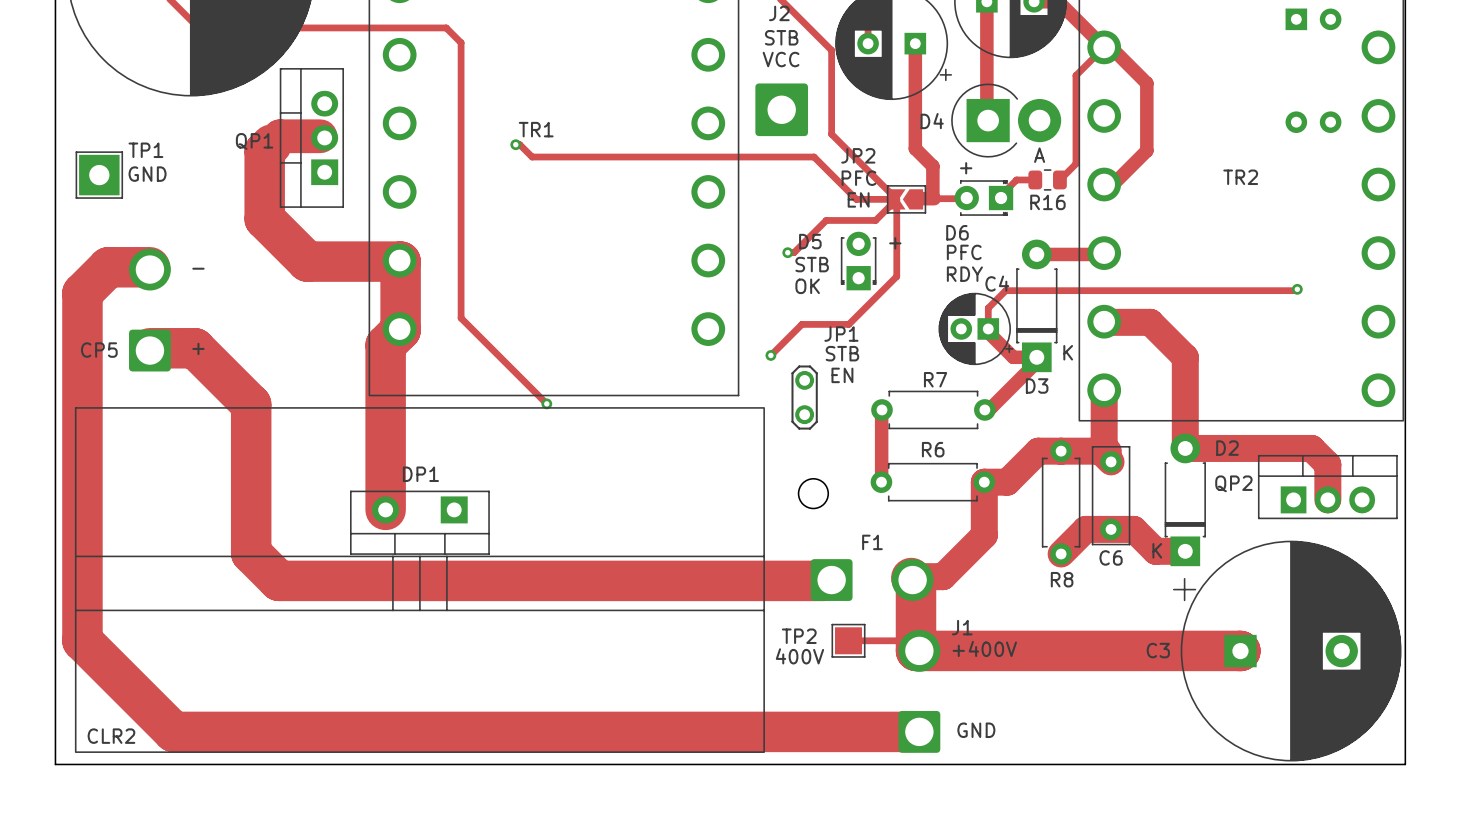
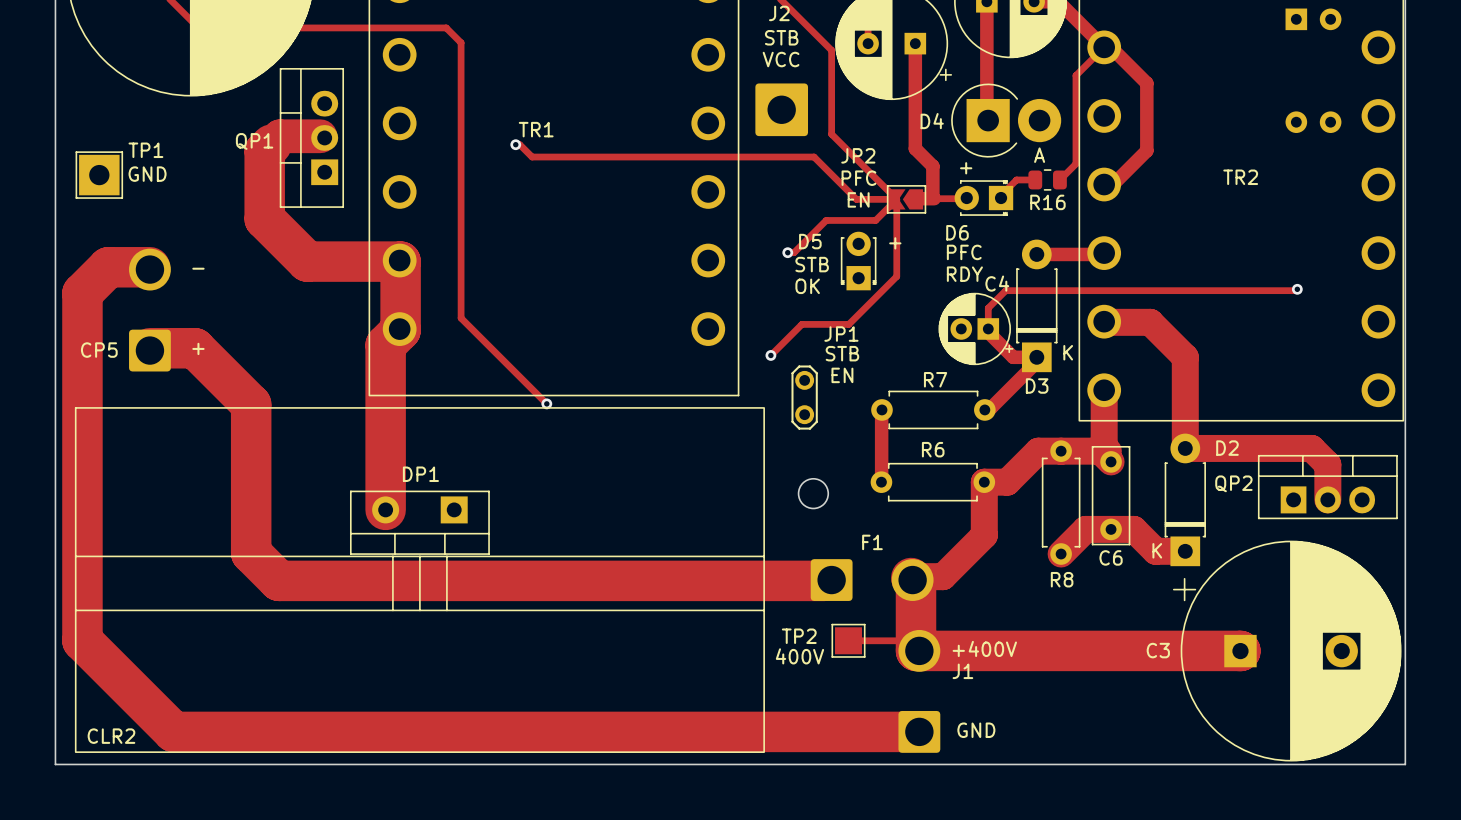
J1 name position: J1 (962, 627) -> J1 (962, 671)

